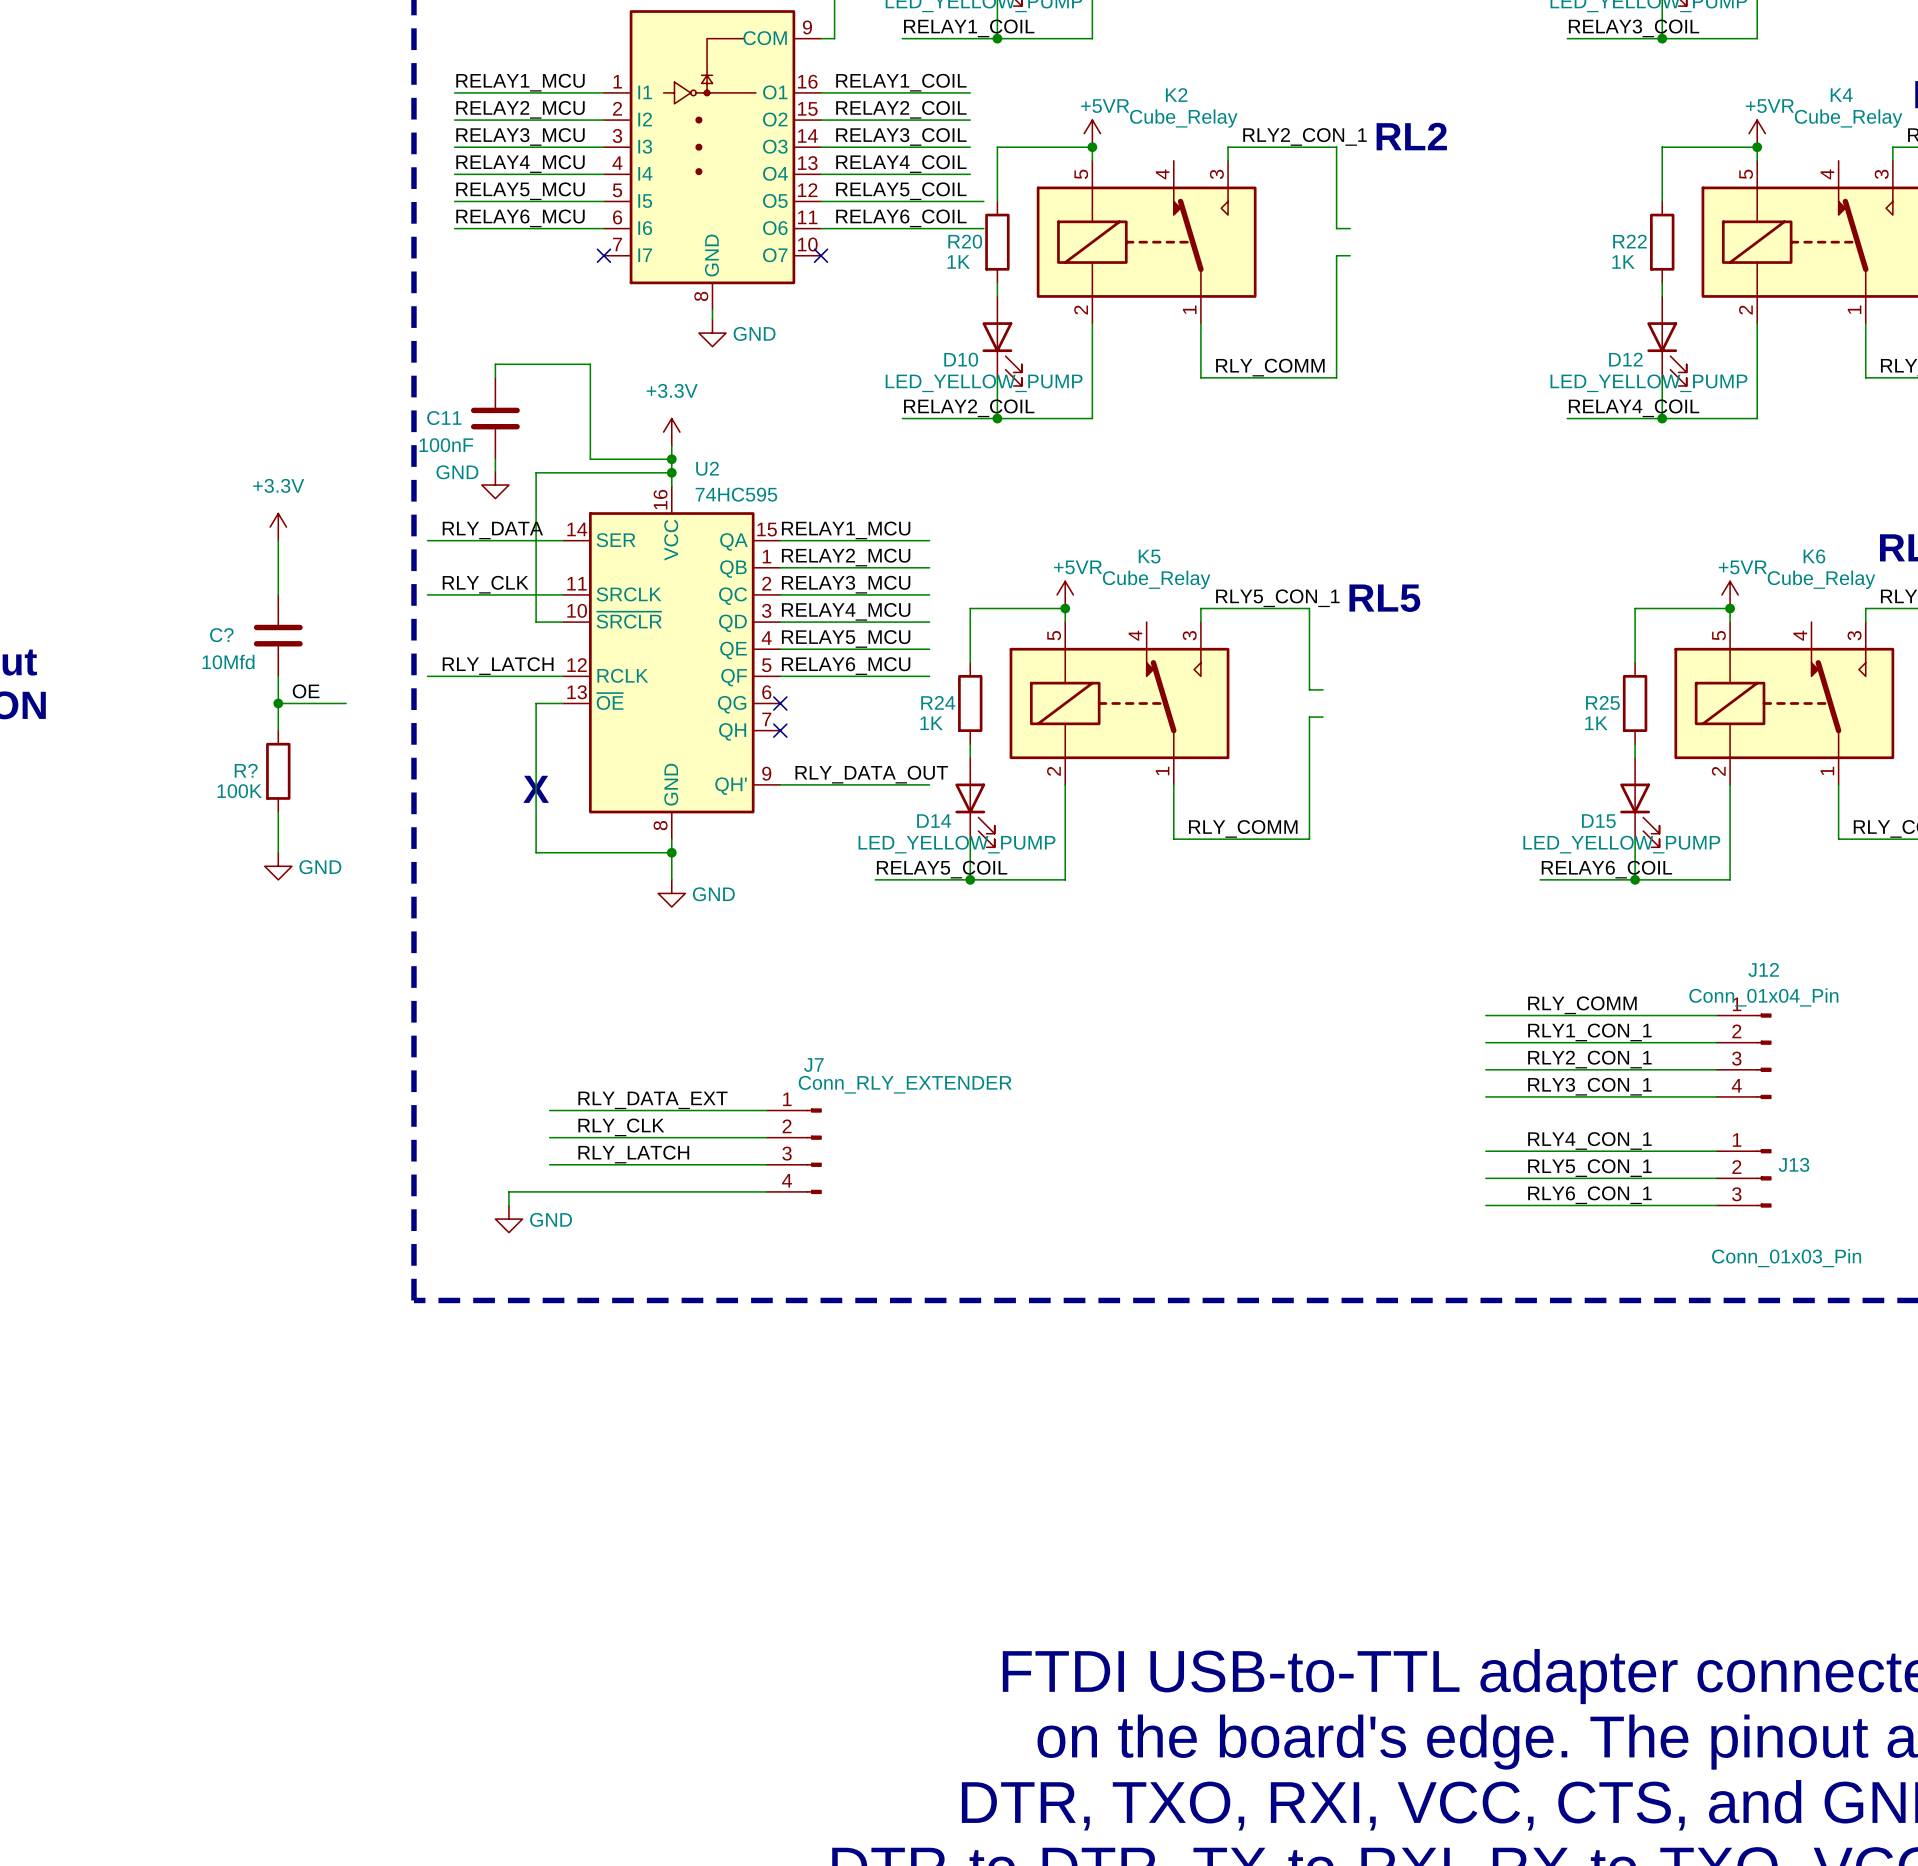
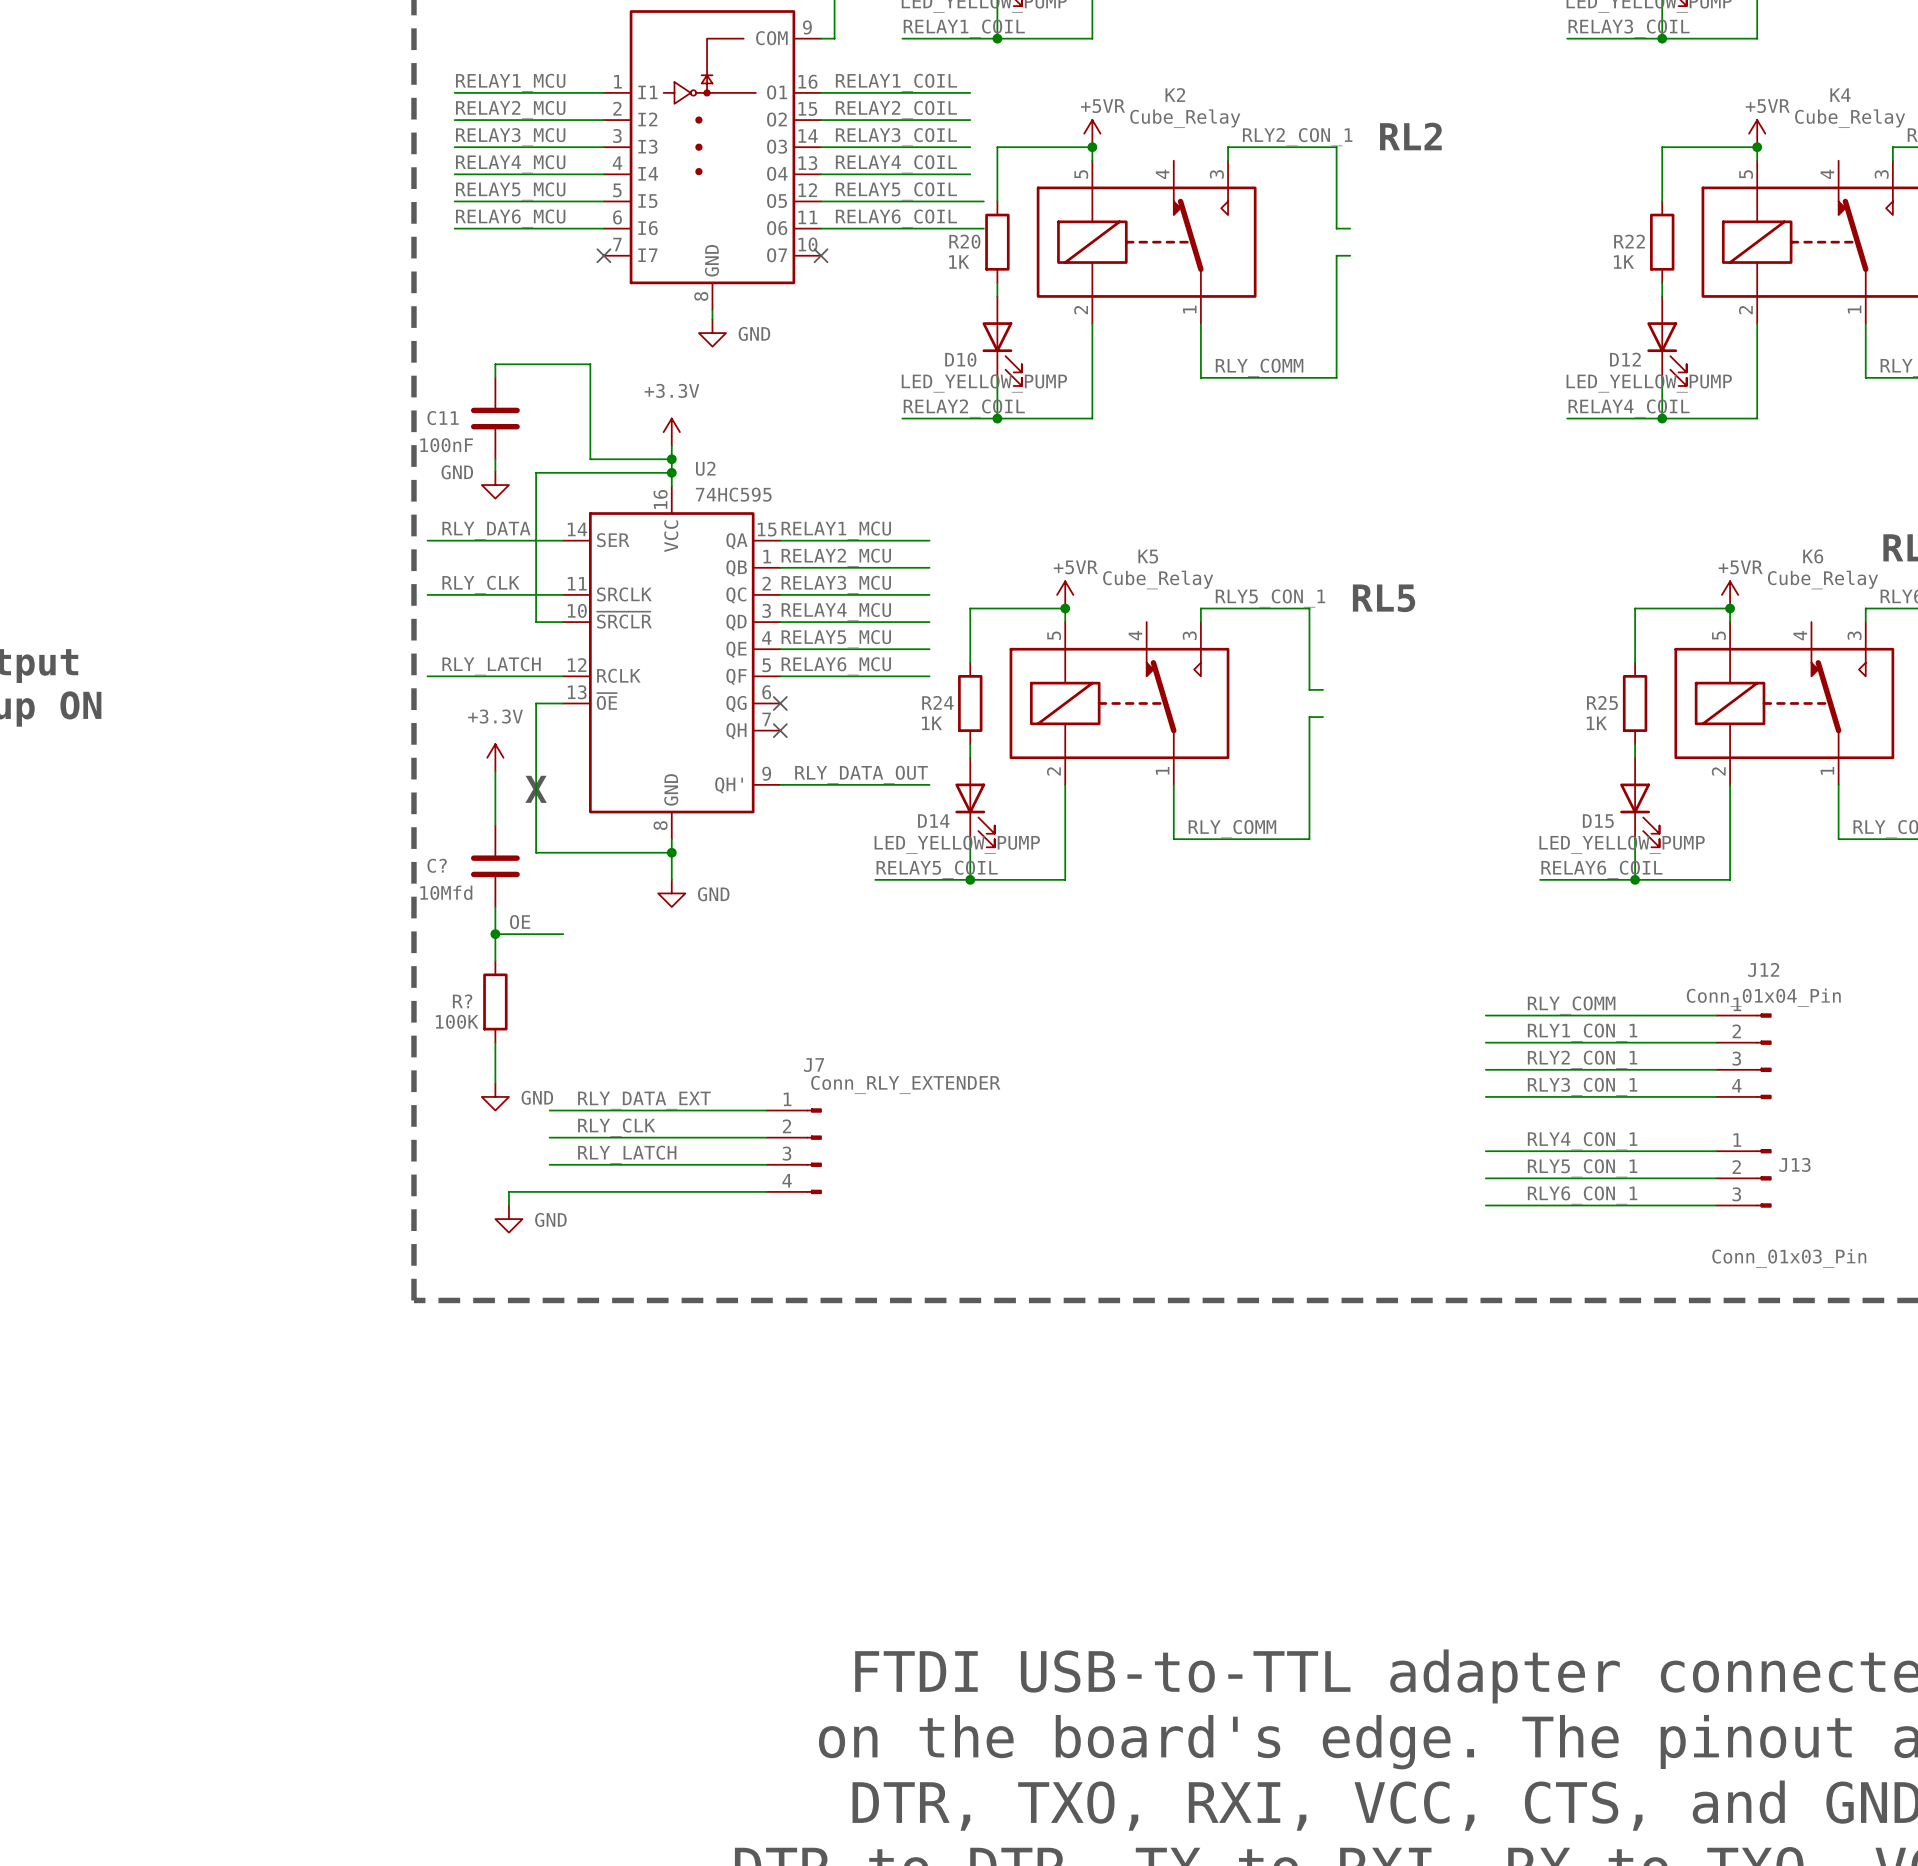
power symbol: +3.3V (278, 527) -> none
wire: (278, 540) (278, 594) -> none
C?: 10Mfd (278, 635) -> none
wire: (278, 676) (278, 730) -> (495, 771) (495, 825)
label: OE (306, 691) -> none
wire: (278, 703) (346, 703) -> none
junction: (278, 703) -> none
power symbol: none -> +3.3V (495, 757)
R?: 100K (278, 771) -> none
wire: (278, 812) (278, 852) -> none
power symbol: GND (278, 866) -> none
C?: none -> 10Mfd (495, 866)
wire: none -> (495, 907) (495, 961)
label: none -> OE (520, 922)
wire: none -> (495, 934) (563, 934)
junction: none -> (495, 934)
R?: none -> 100K (495, 1001)
wire: none -> (495, 1042) (495, 1083)
power symbol: none -> GND (495, 1096)

